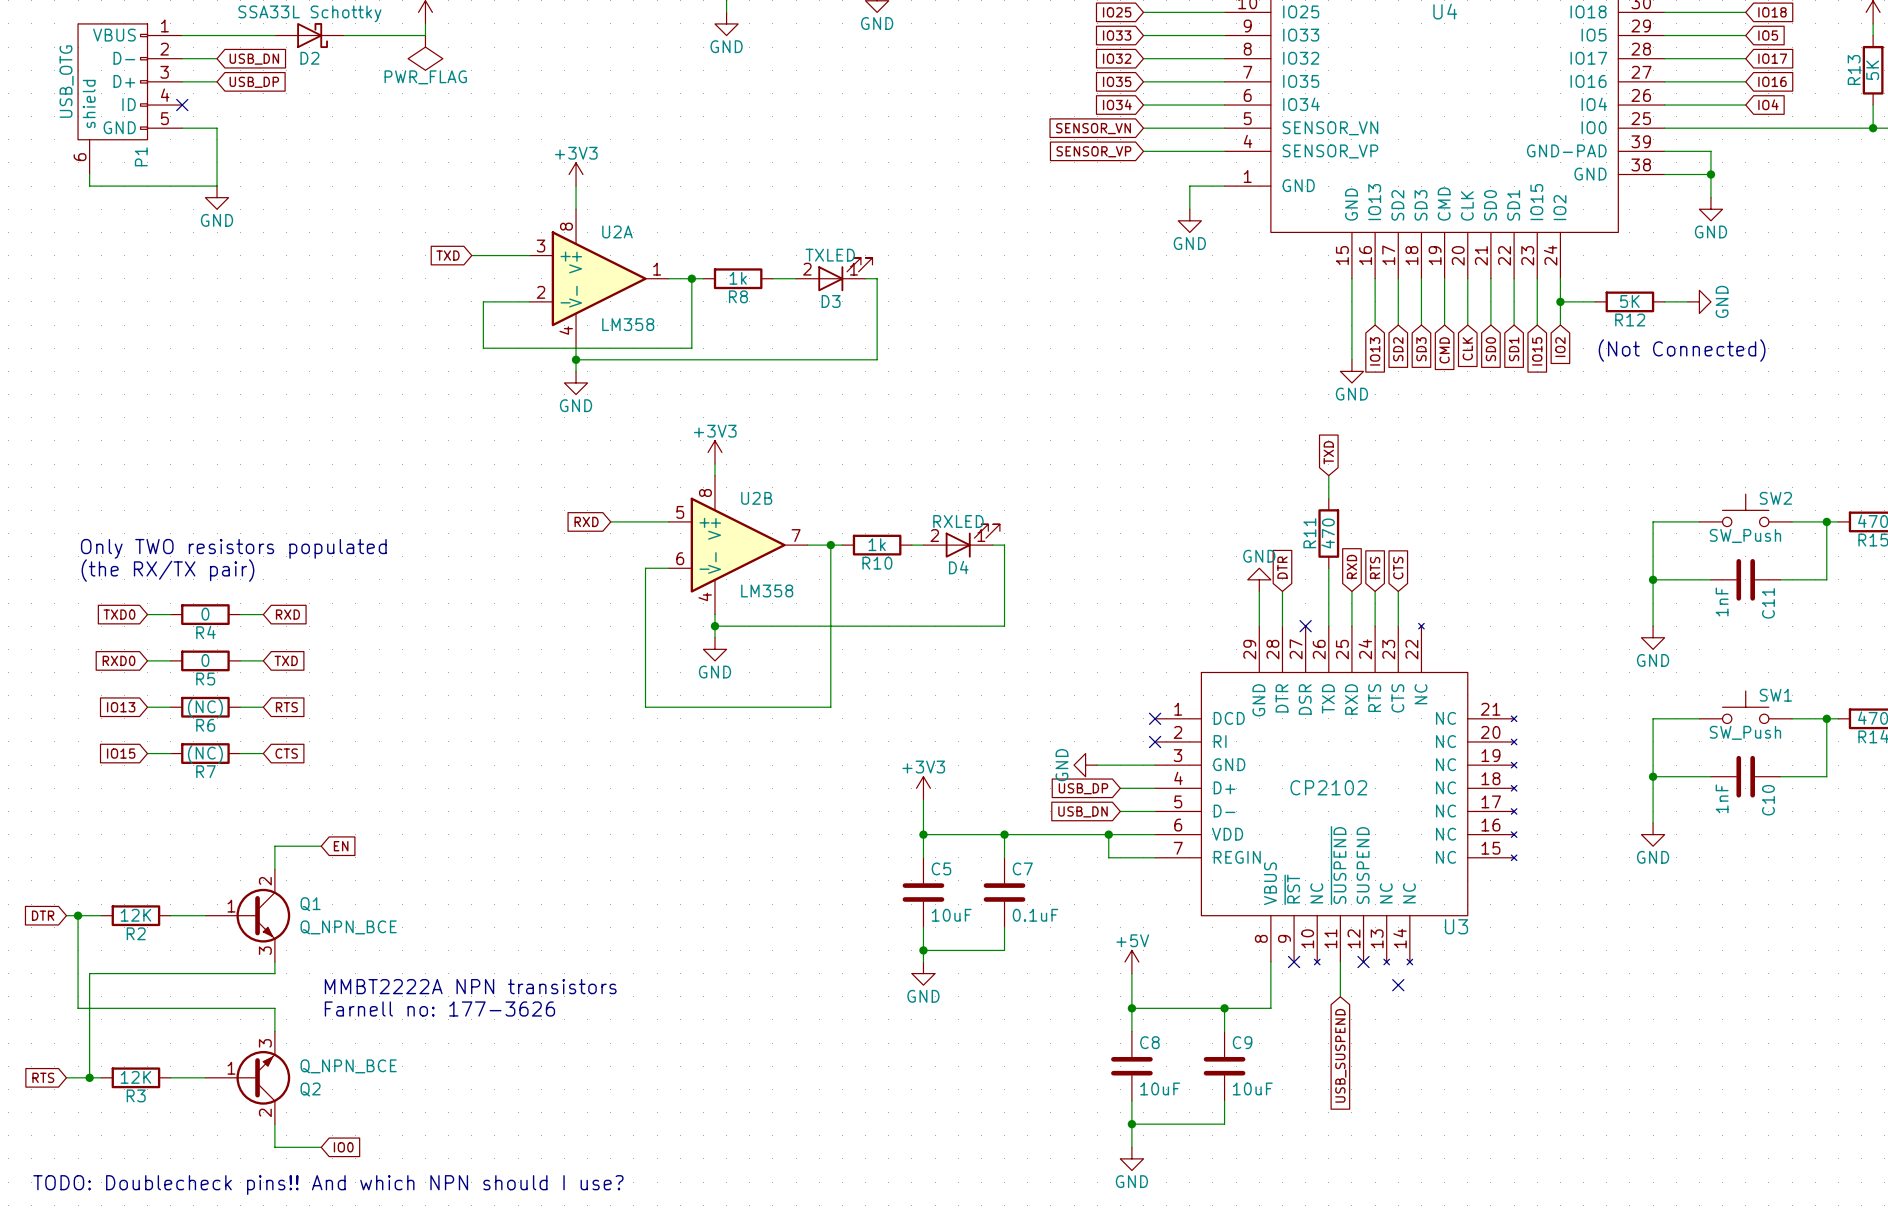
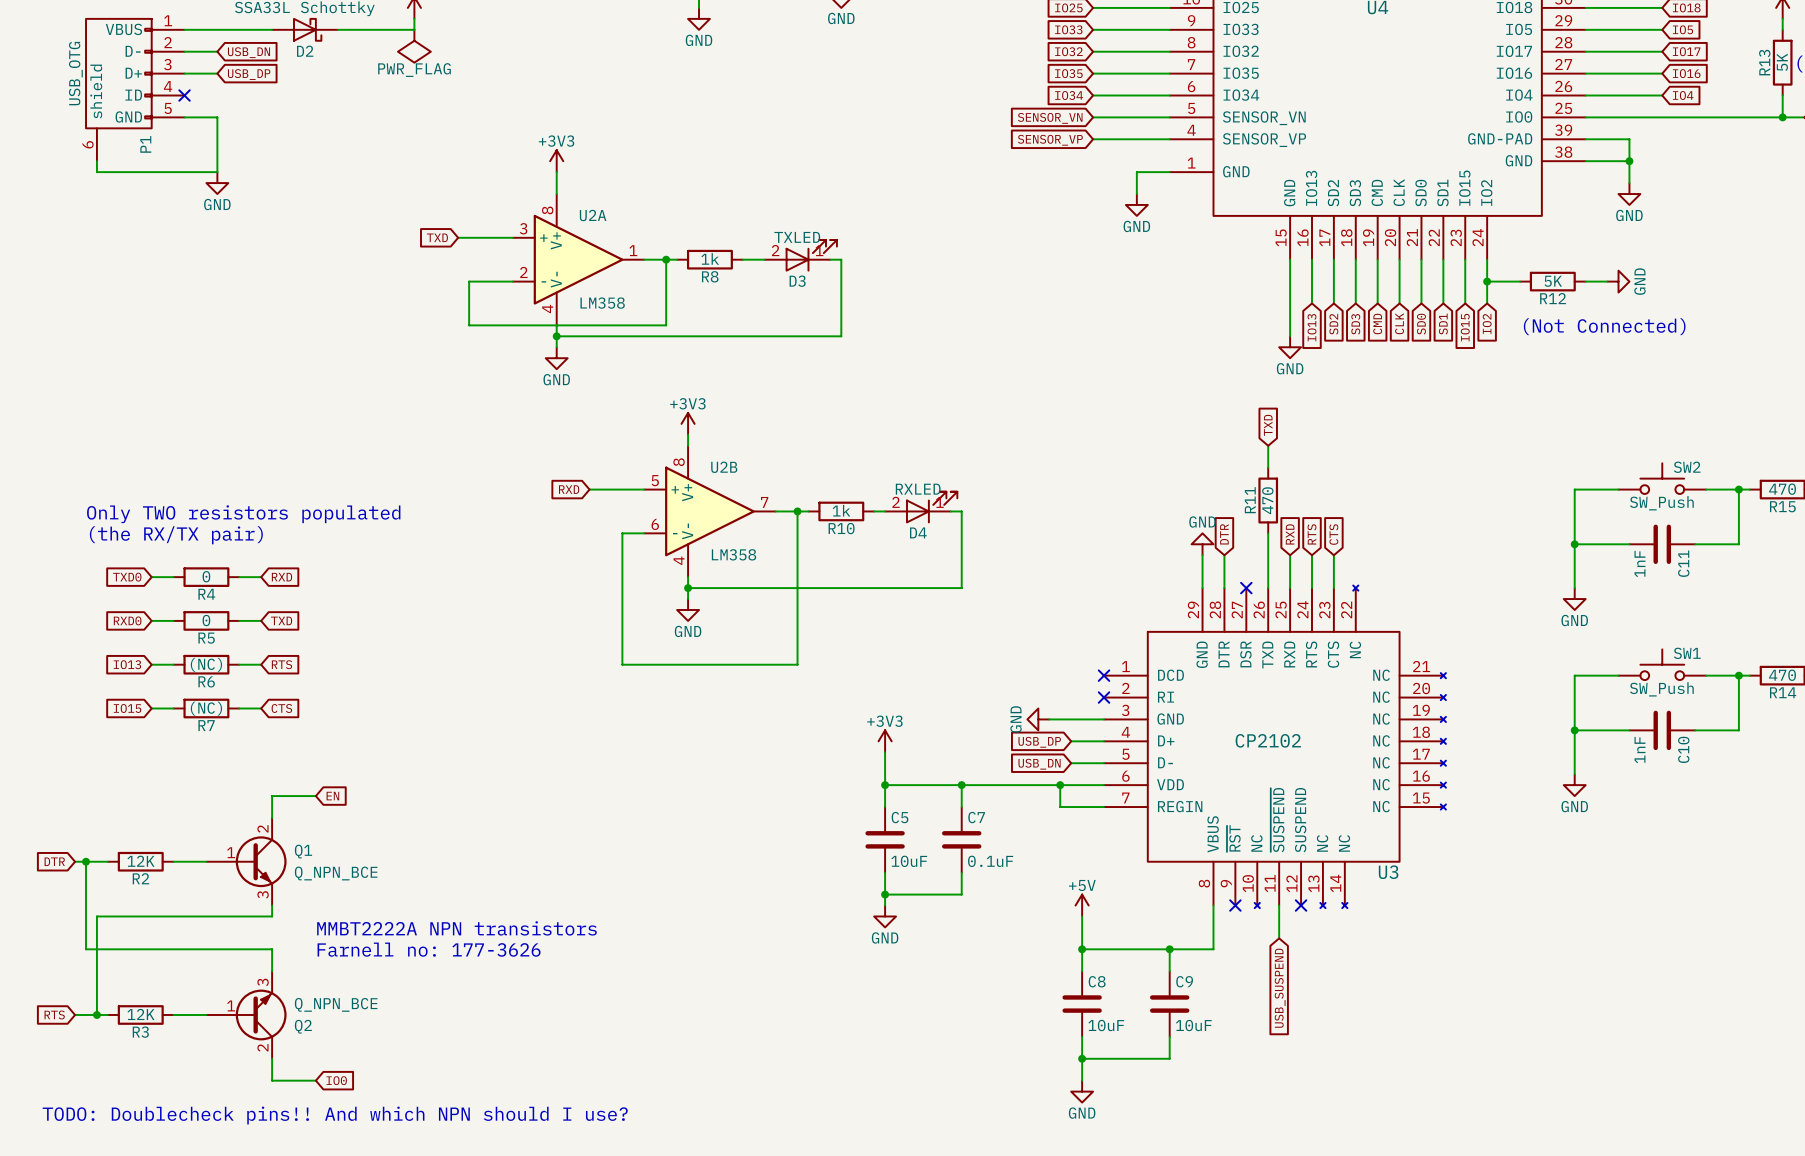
no-connect mark: (1398, 985) -> none

